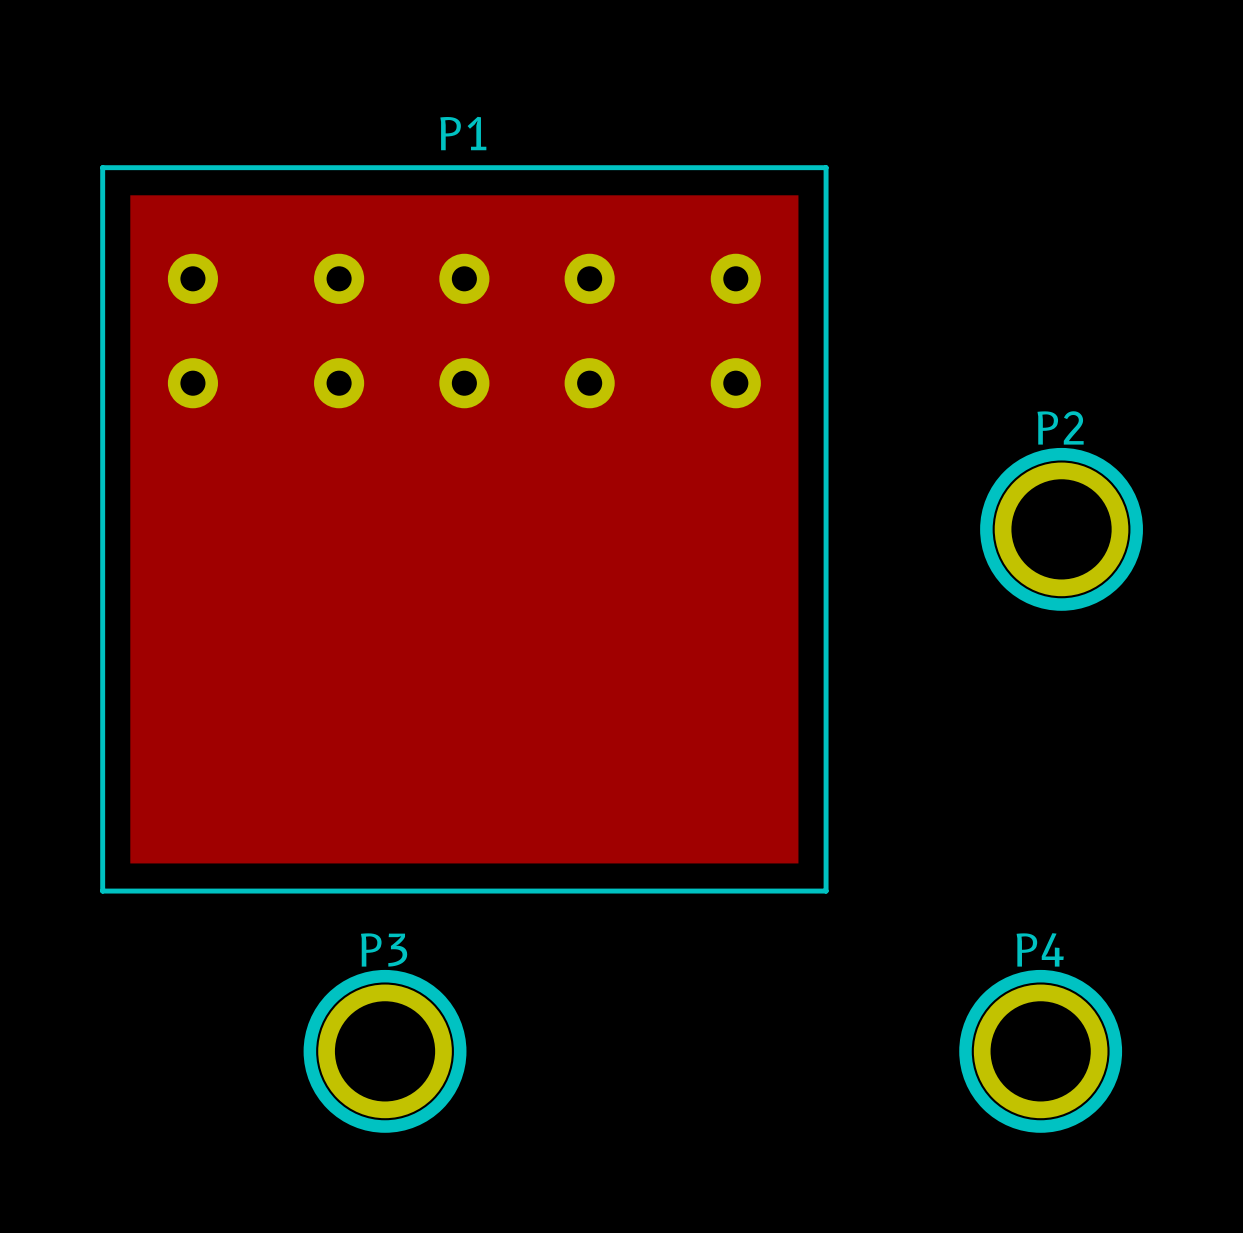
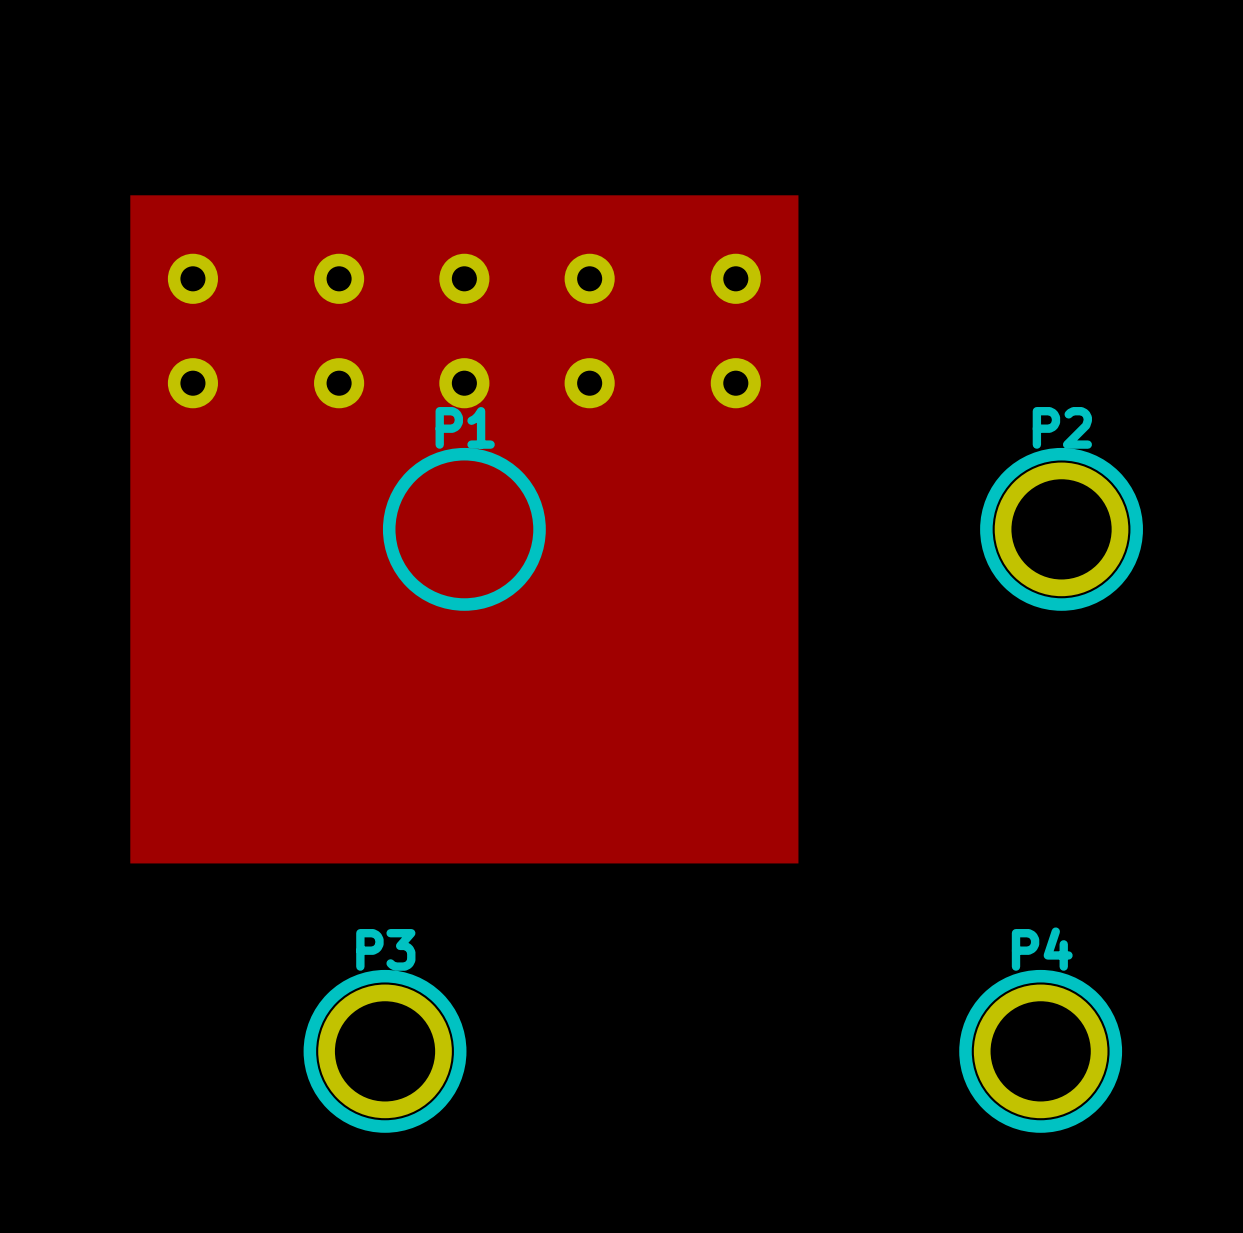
P1 name position: P1 (463, 133) -> P1 (465, 427)
P1 footprint: [100, 165, 829, 894] -> [130, 195, 799, 864]

